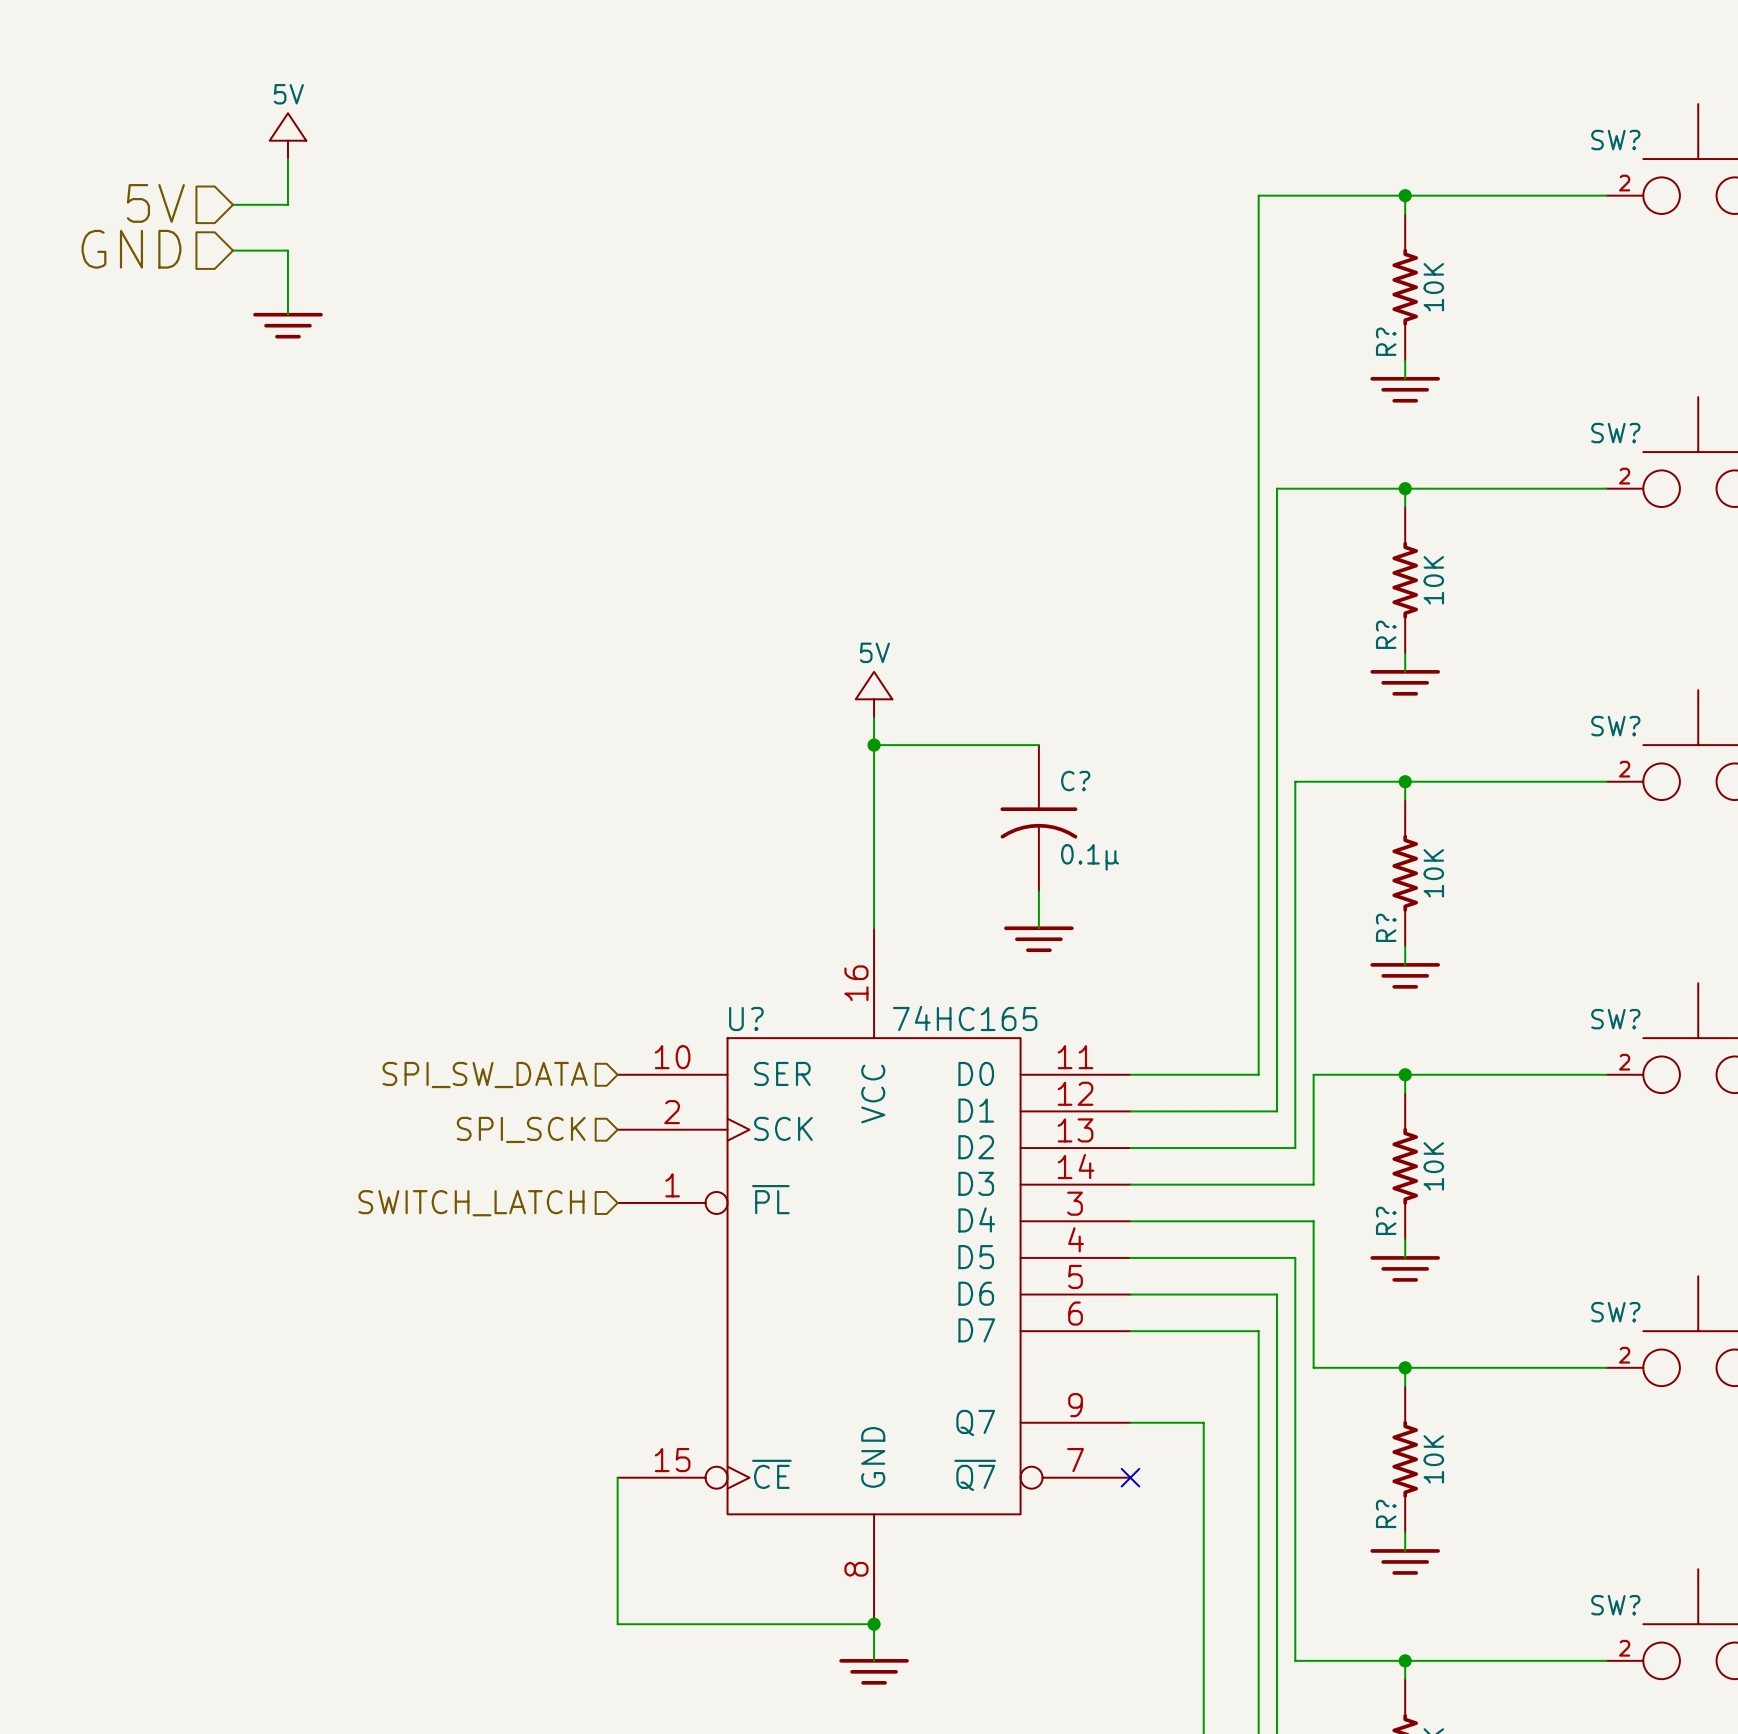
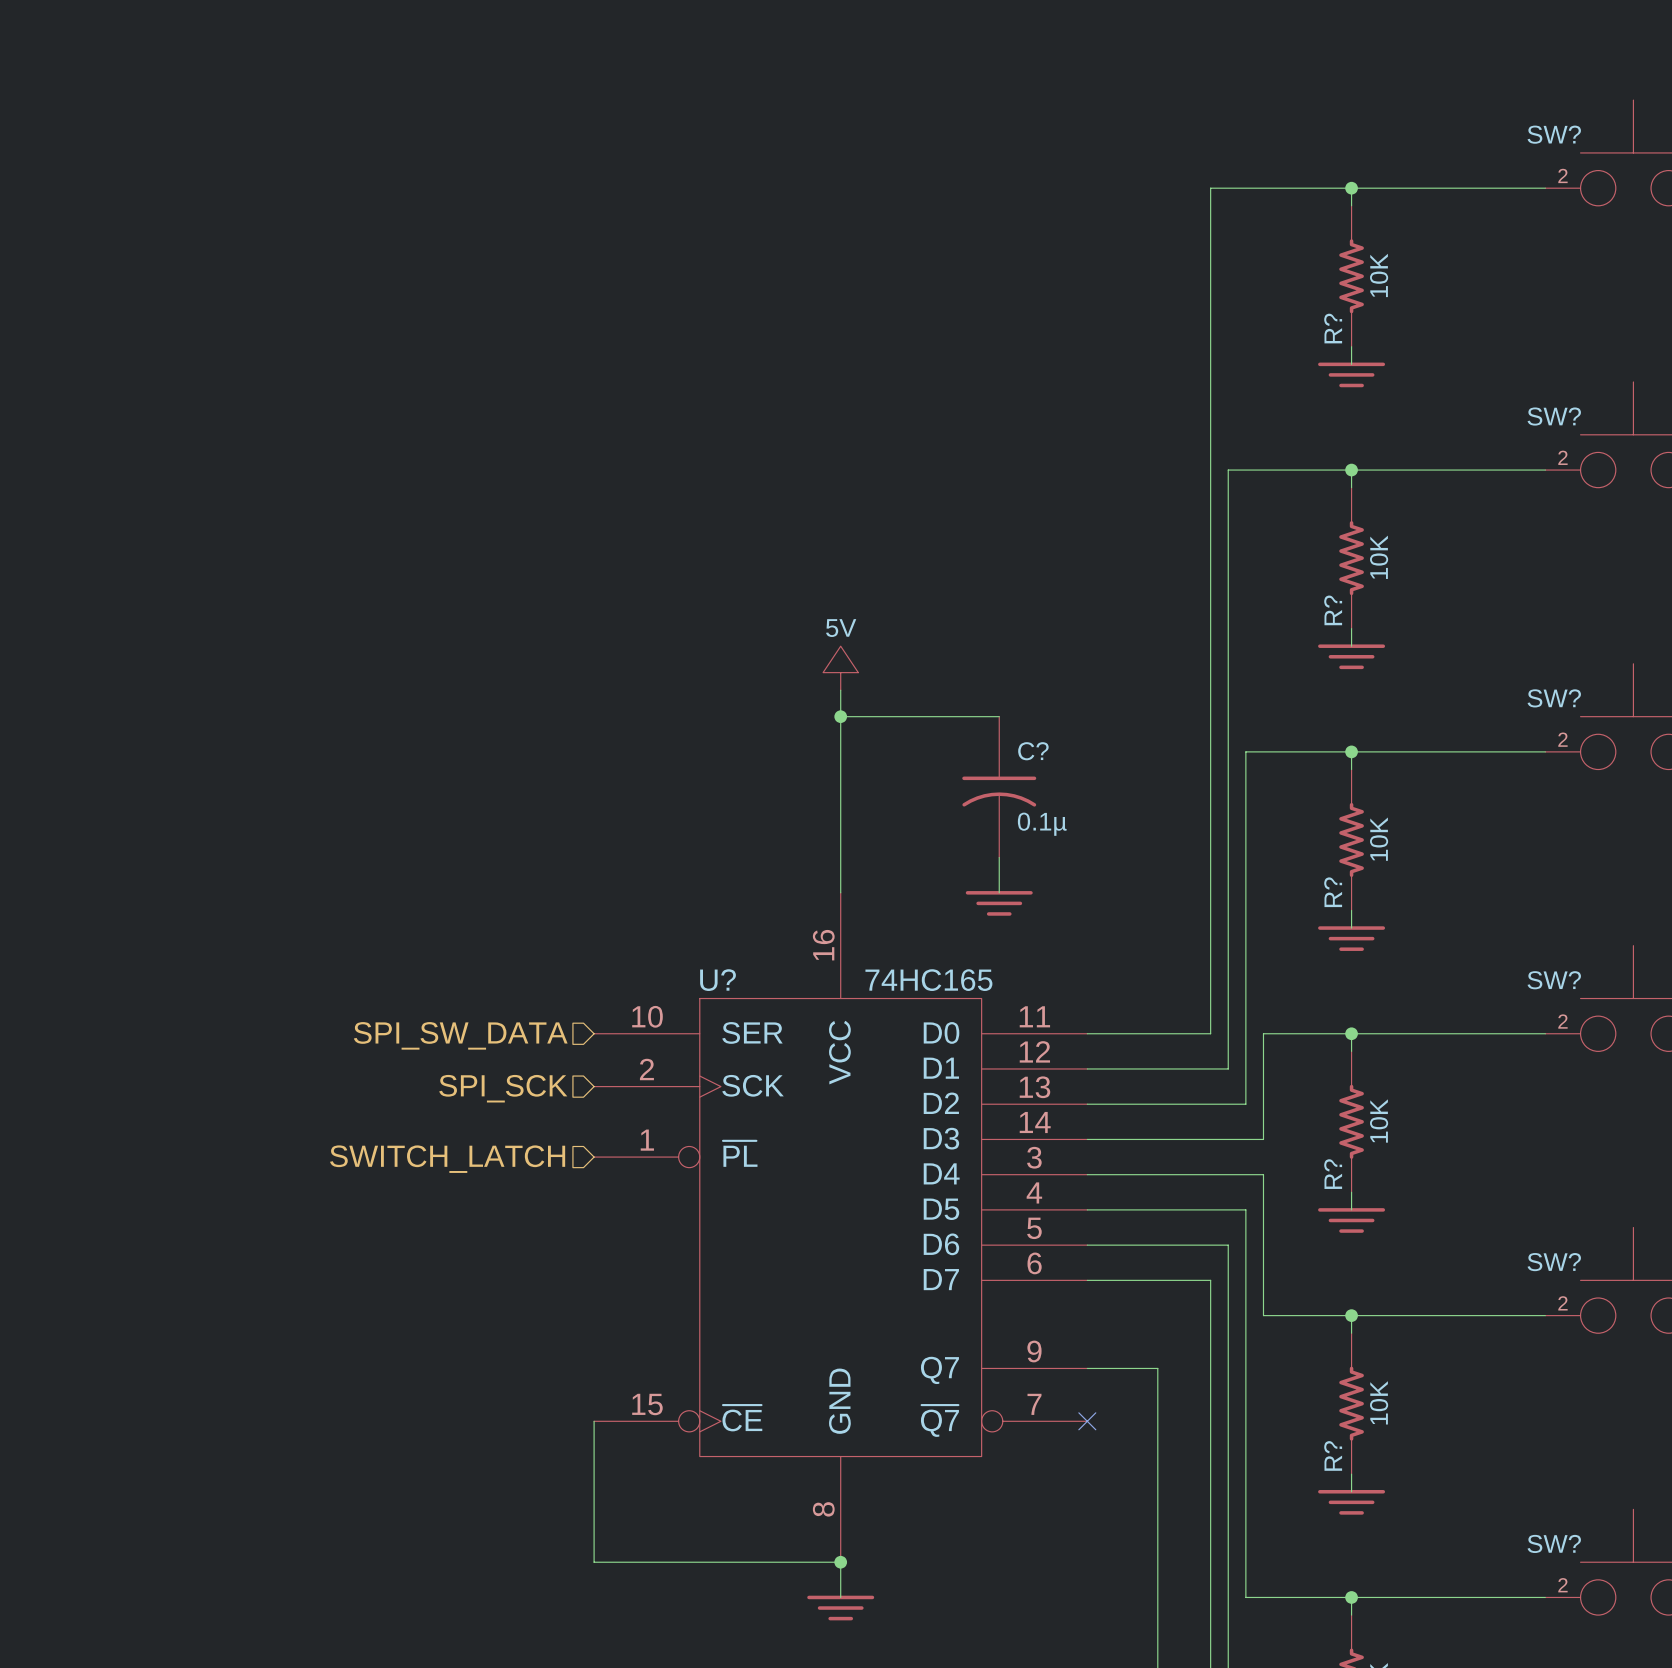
power symbol: 5V (287, 136) -> none
wire: (287, 159) (287, 204) (233, 204) -> none
hierarchical label: 5V (155, 203) -> none
hierarchical label: GND (131, 249) -> none
wire: (233, 250) (287, 250) (287, 314) -> none
power symbol: (287, 325) -> none

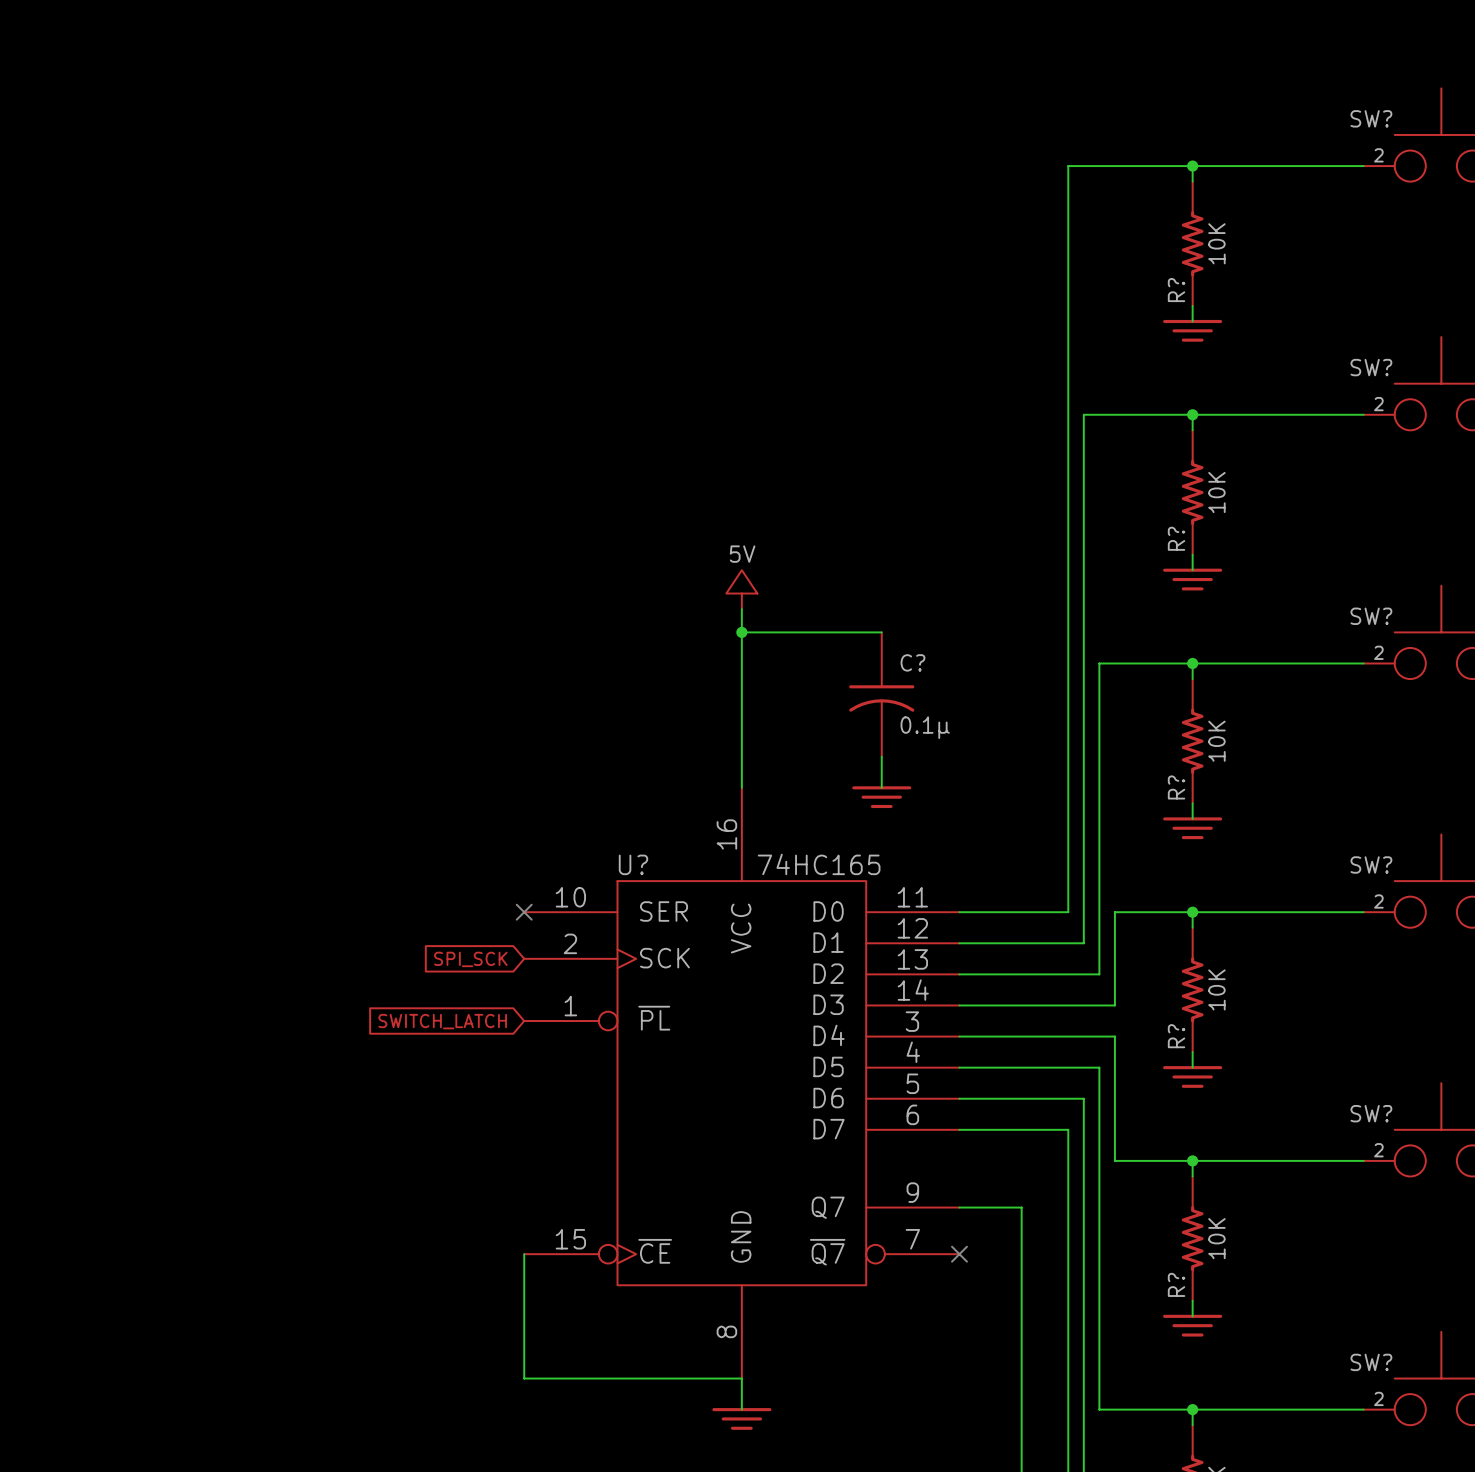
no-connect mark: none -> (524, 912)
hierarchical label: SPI_SW_DATA (460, 1035) -> none
hierarchical label: SPI_SCK (503, 1088) -> none
global label: none -> SPI_SCK (470, 959)
global label: none -> SWITCH_LATCH (442, 1021)
hierarchical label: SWITCH_LATCH (447, 1159) -> none
junction: (840, 1562) -> none

